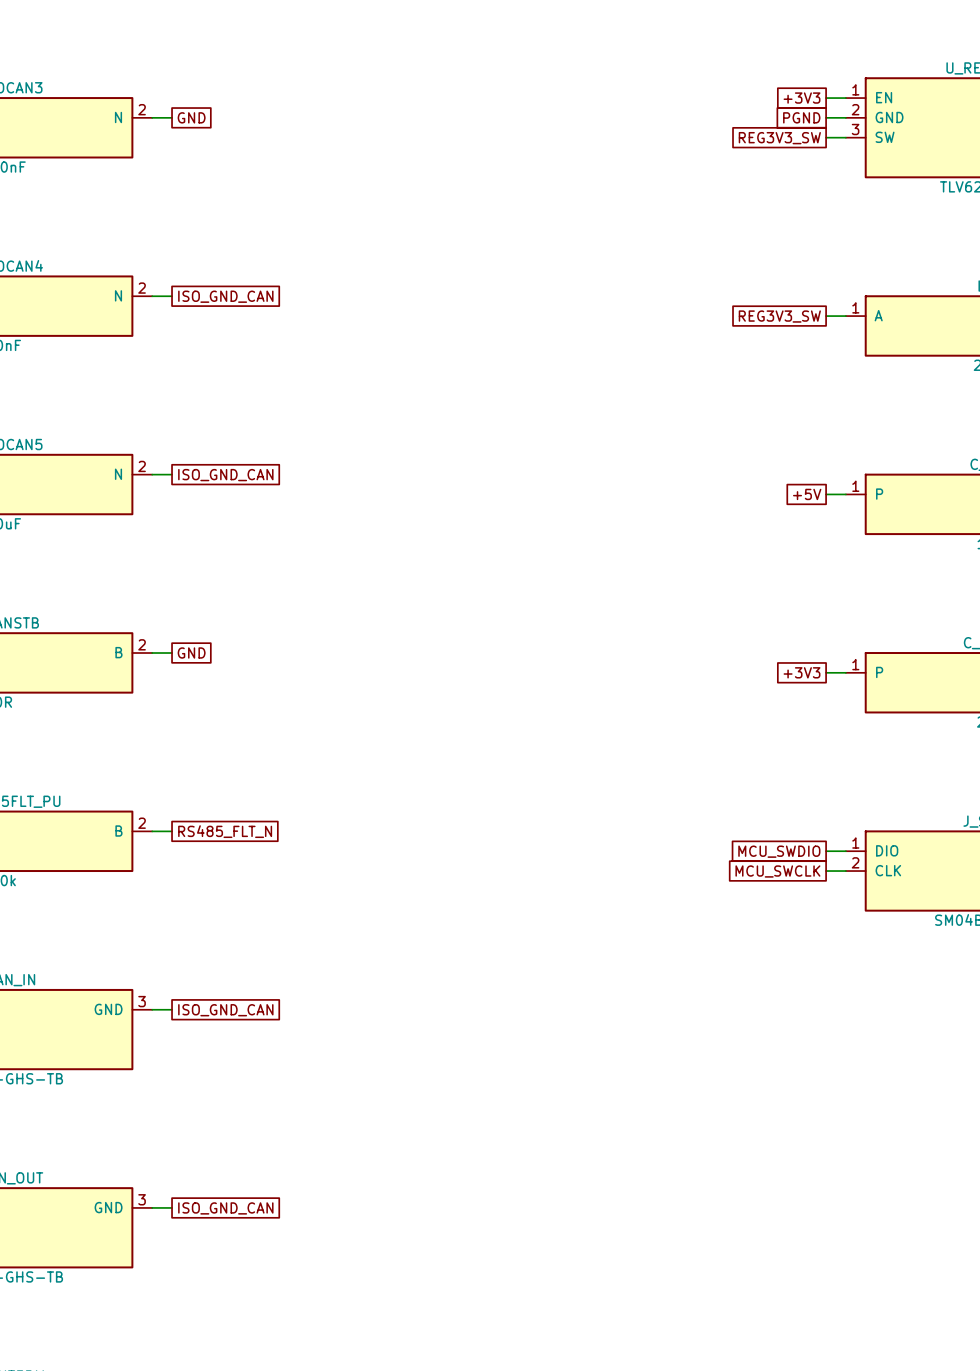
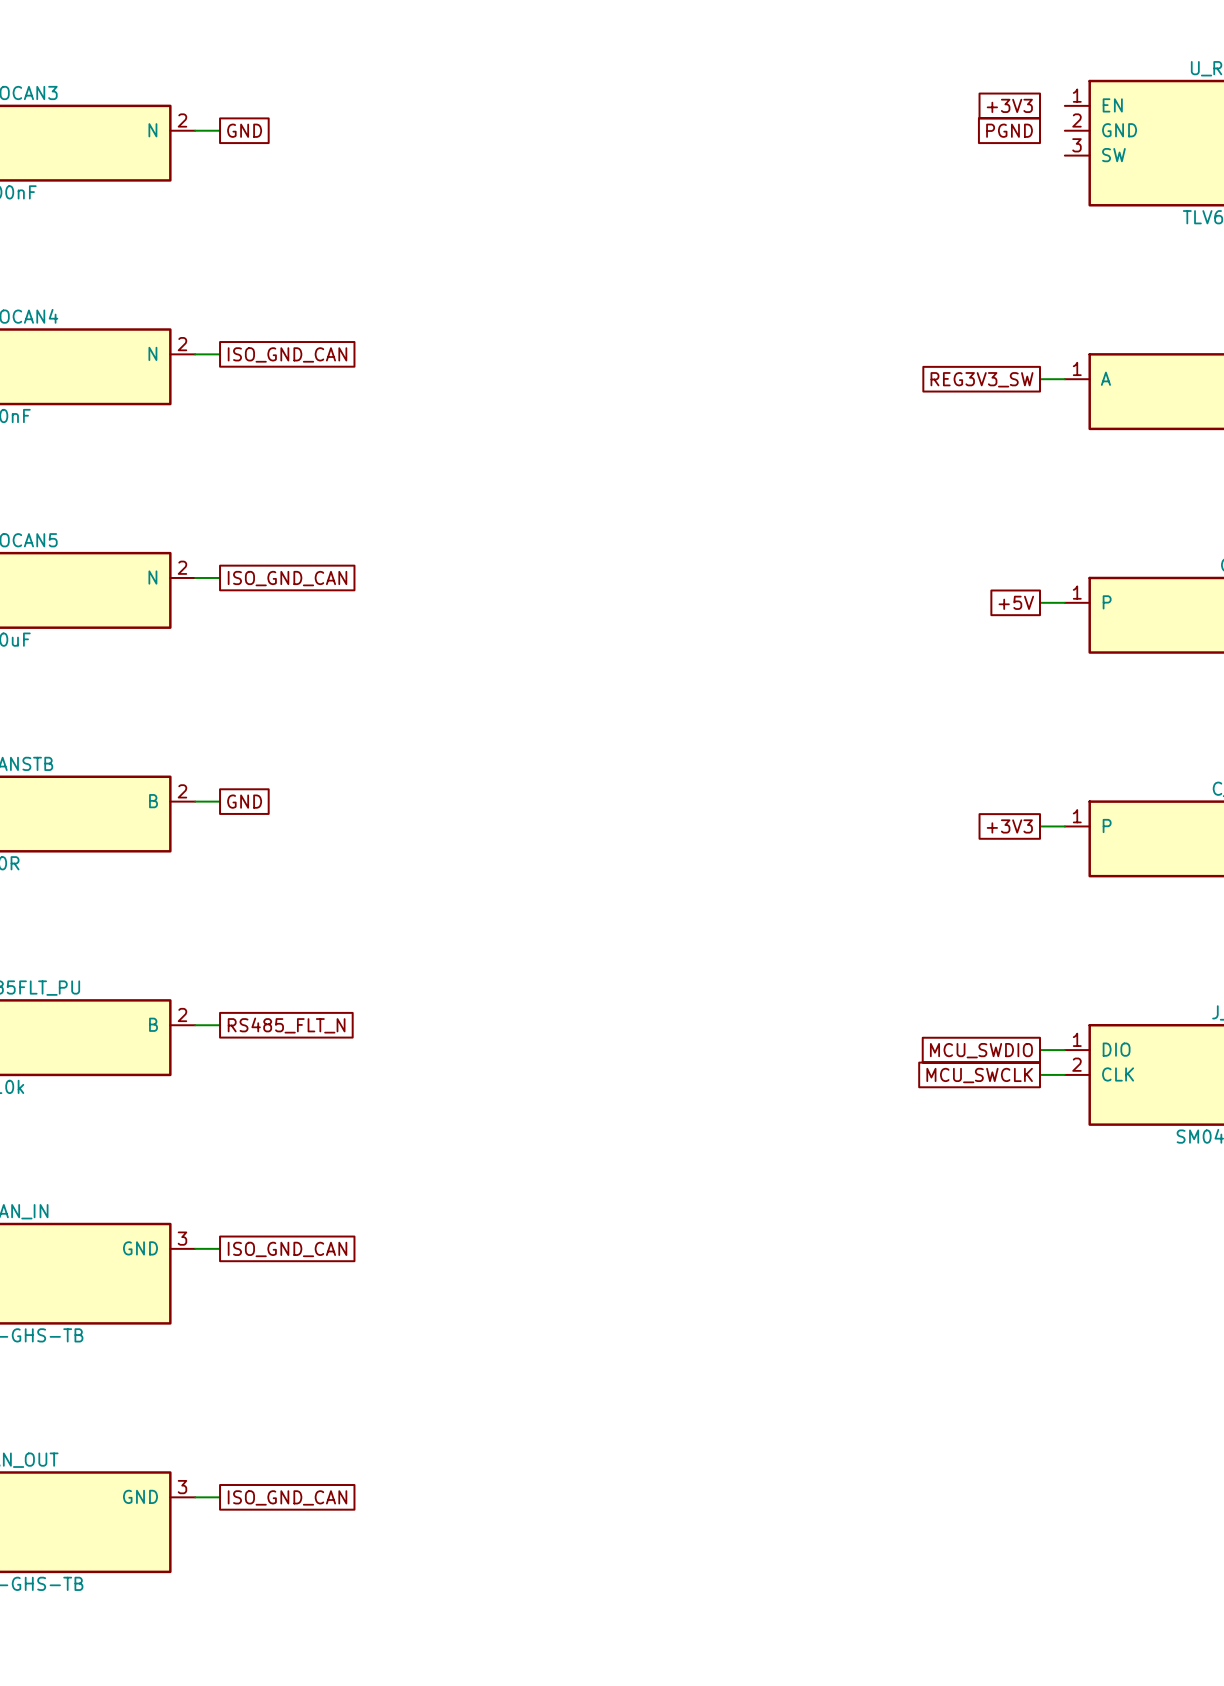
wire: (826, 98) (845, 98) -> none
wire: (826, 117) (845, 117) -> none
wire: (826, 137) (845, 137) -> none
global label: REG3V3_SW (779, 138) -> none

